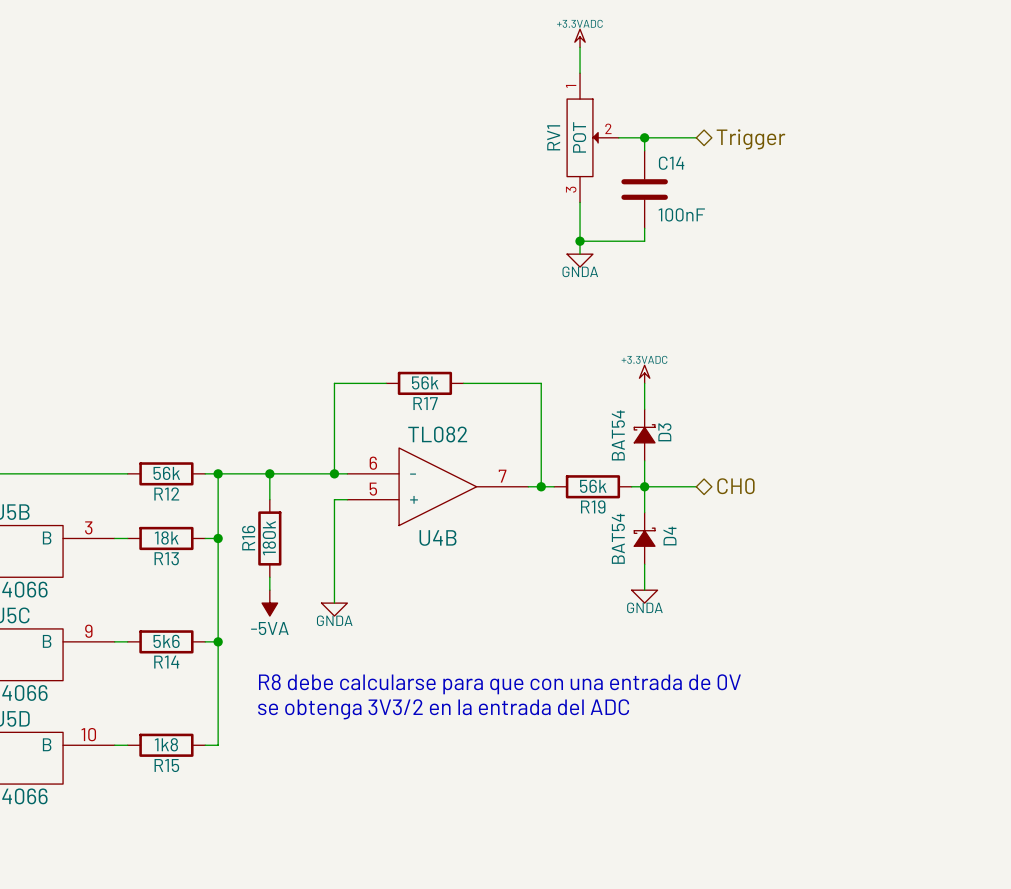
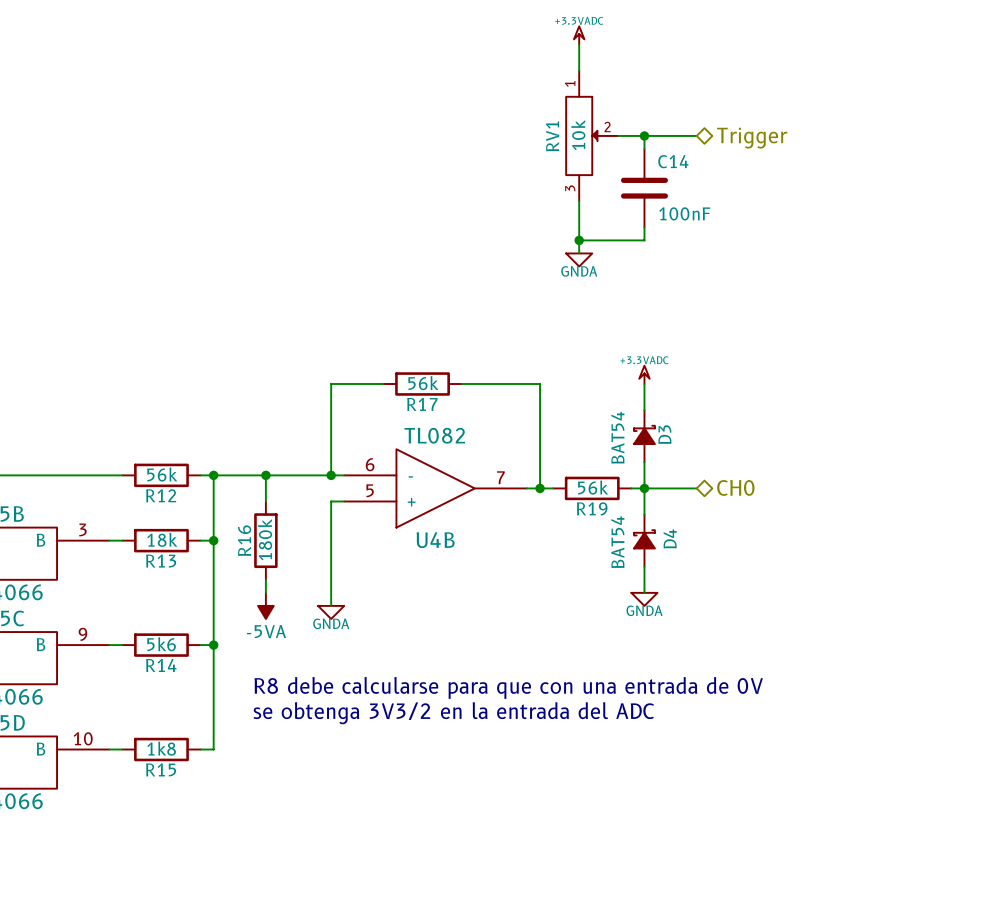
RV1 value: POT (579, 137) -> 10k (578, 135)

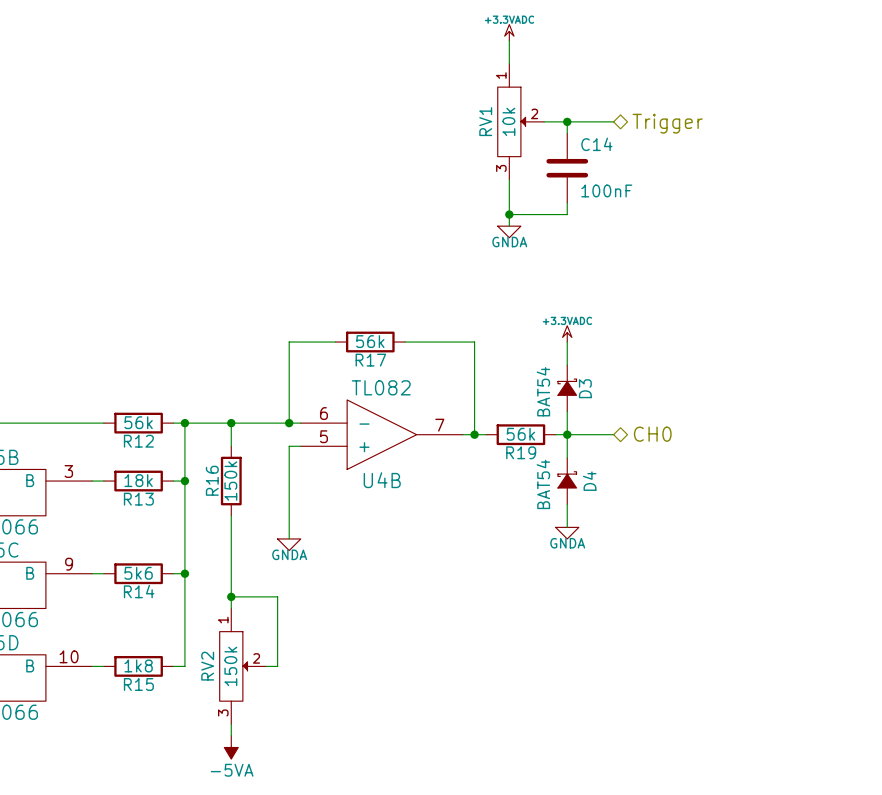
R16 value: 180k (265, 539) -> 150k (230, 481)
wire: none -> (231, 527) (231, 608)
power symbol position: -5VA (265, 605) -> -5VA (231, 747)
wire: none -> (231, 596) (277, 596) (277, 666) (266, 666)
junction: none -> (231, 596)
text: R8 debe calcularse para que con una entrada de 0V (508, 687) -> none
text: se obtenga 3V3/2 en la entrada del ADC (453, 713) -> none
RV2: none -> 150k (242, 666)
wire: none -> (231, 724) (231, 735)

